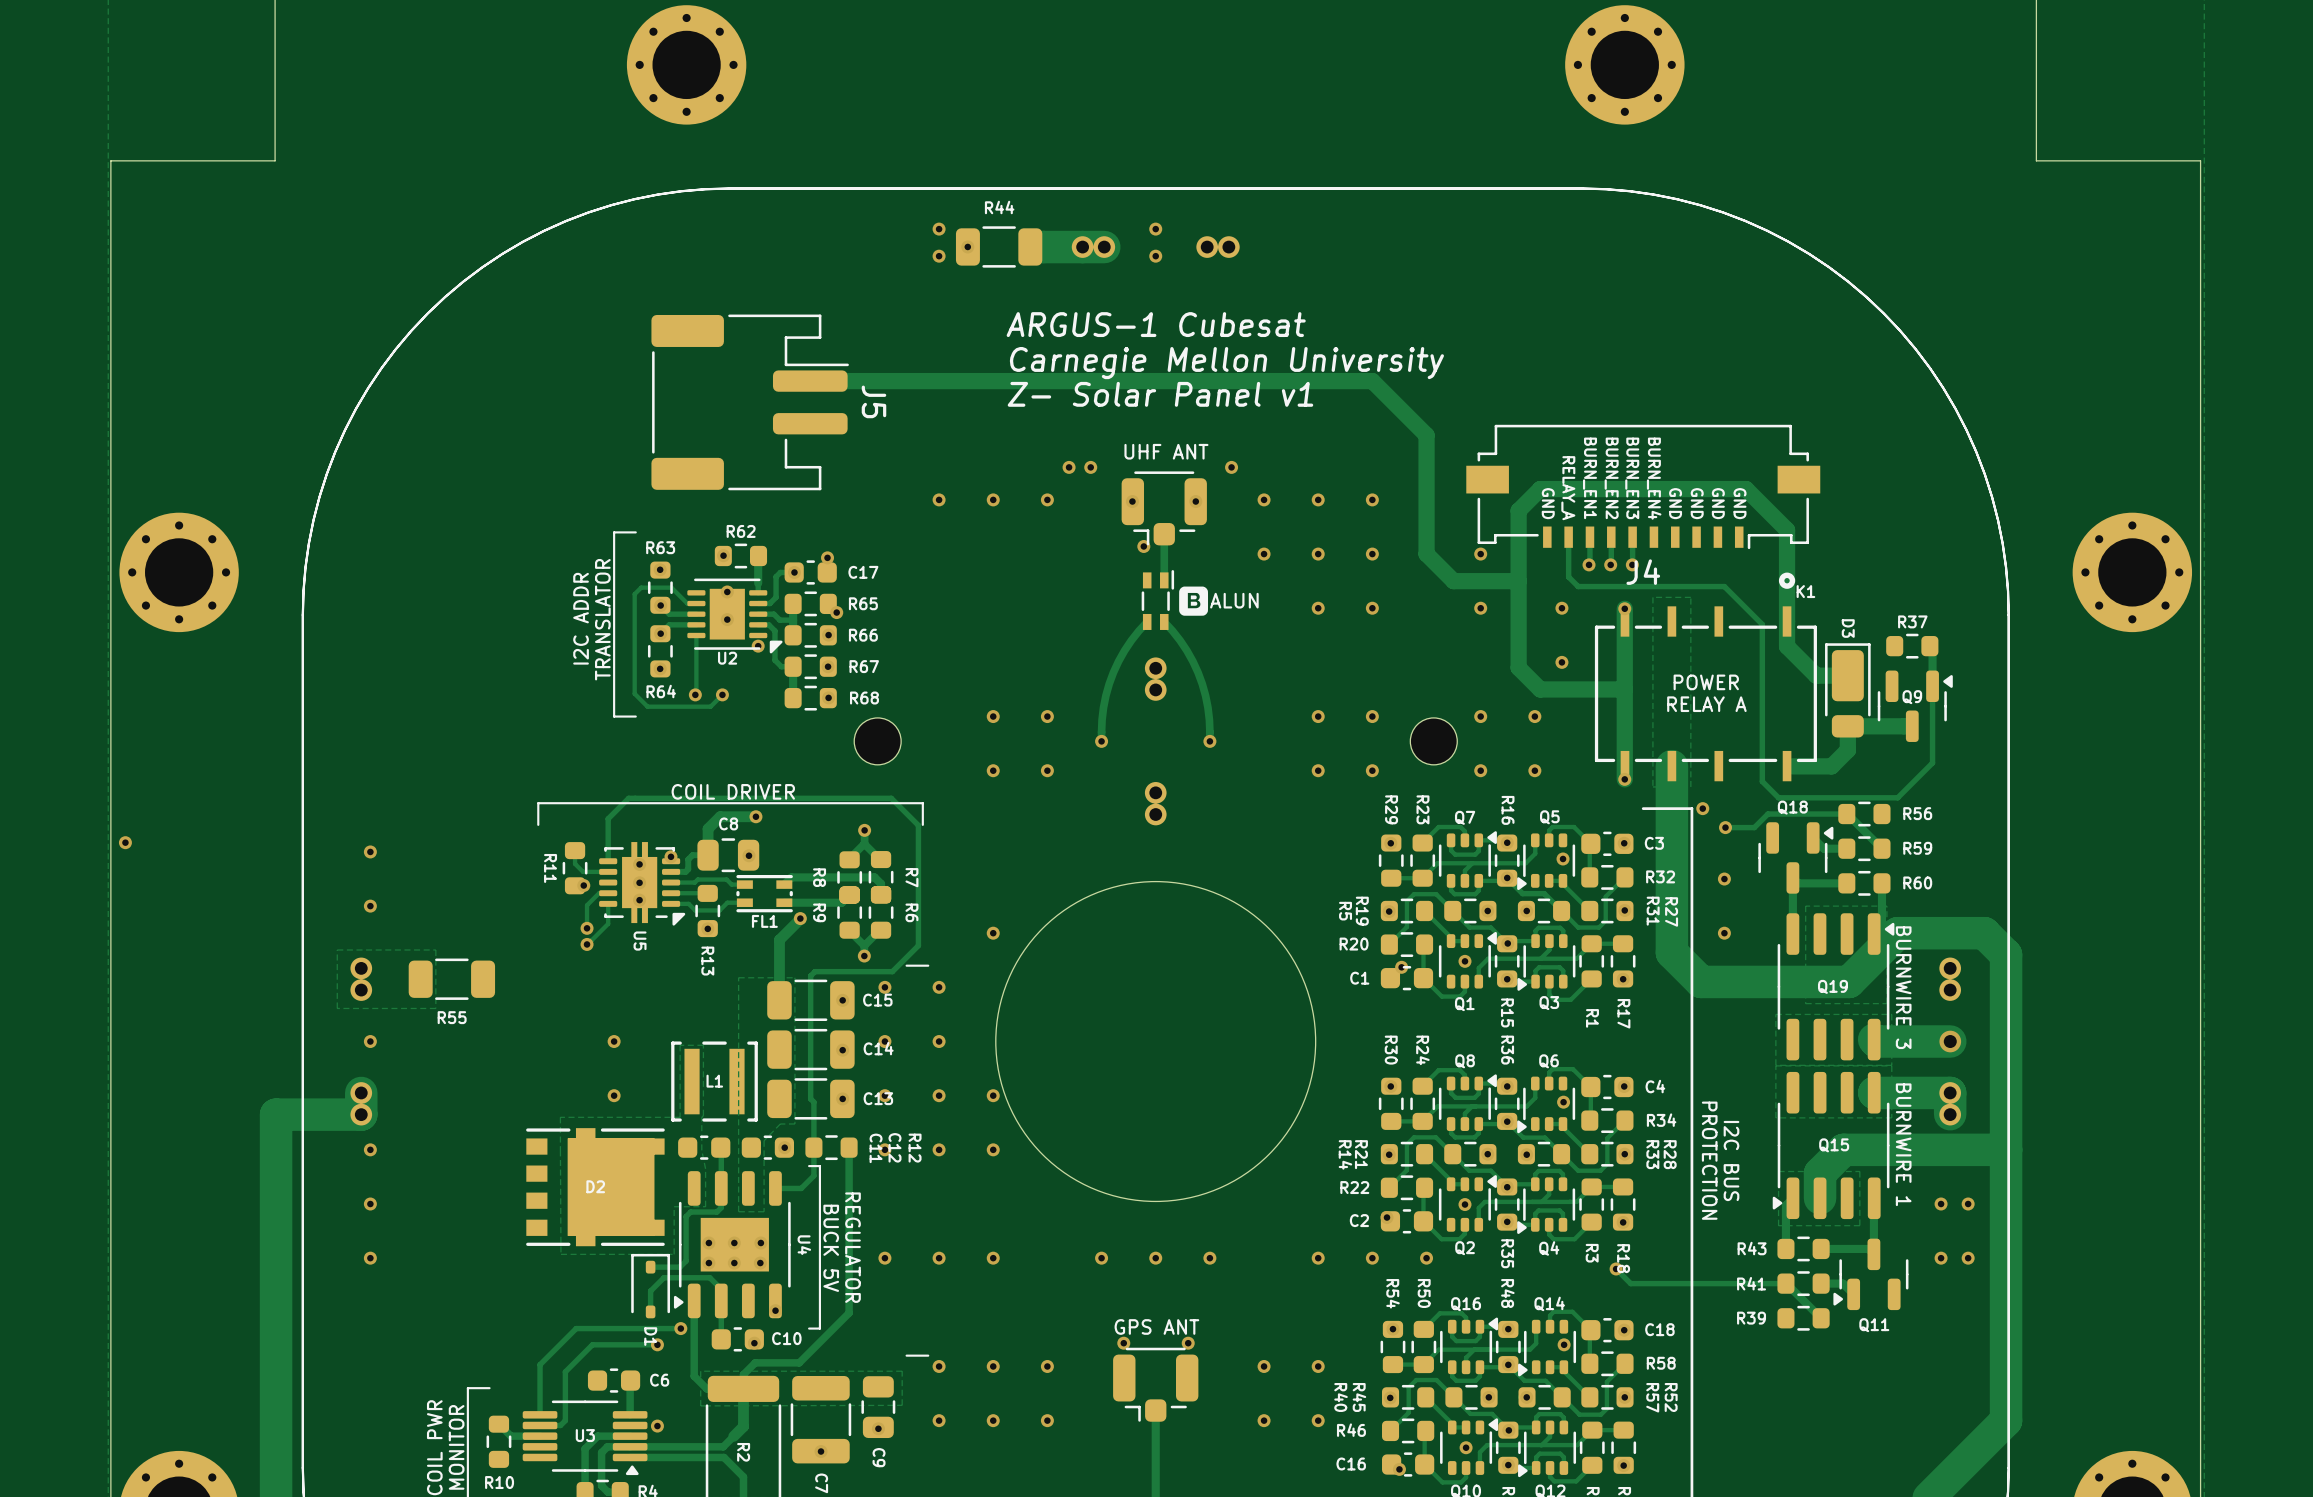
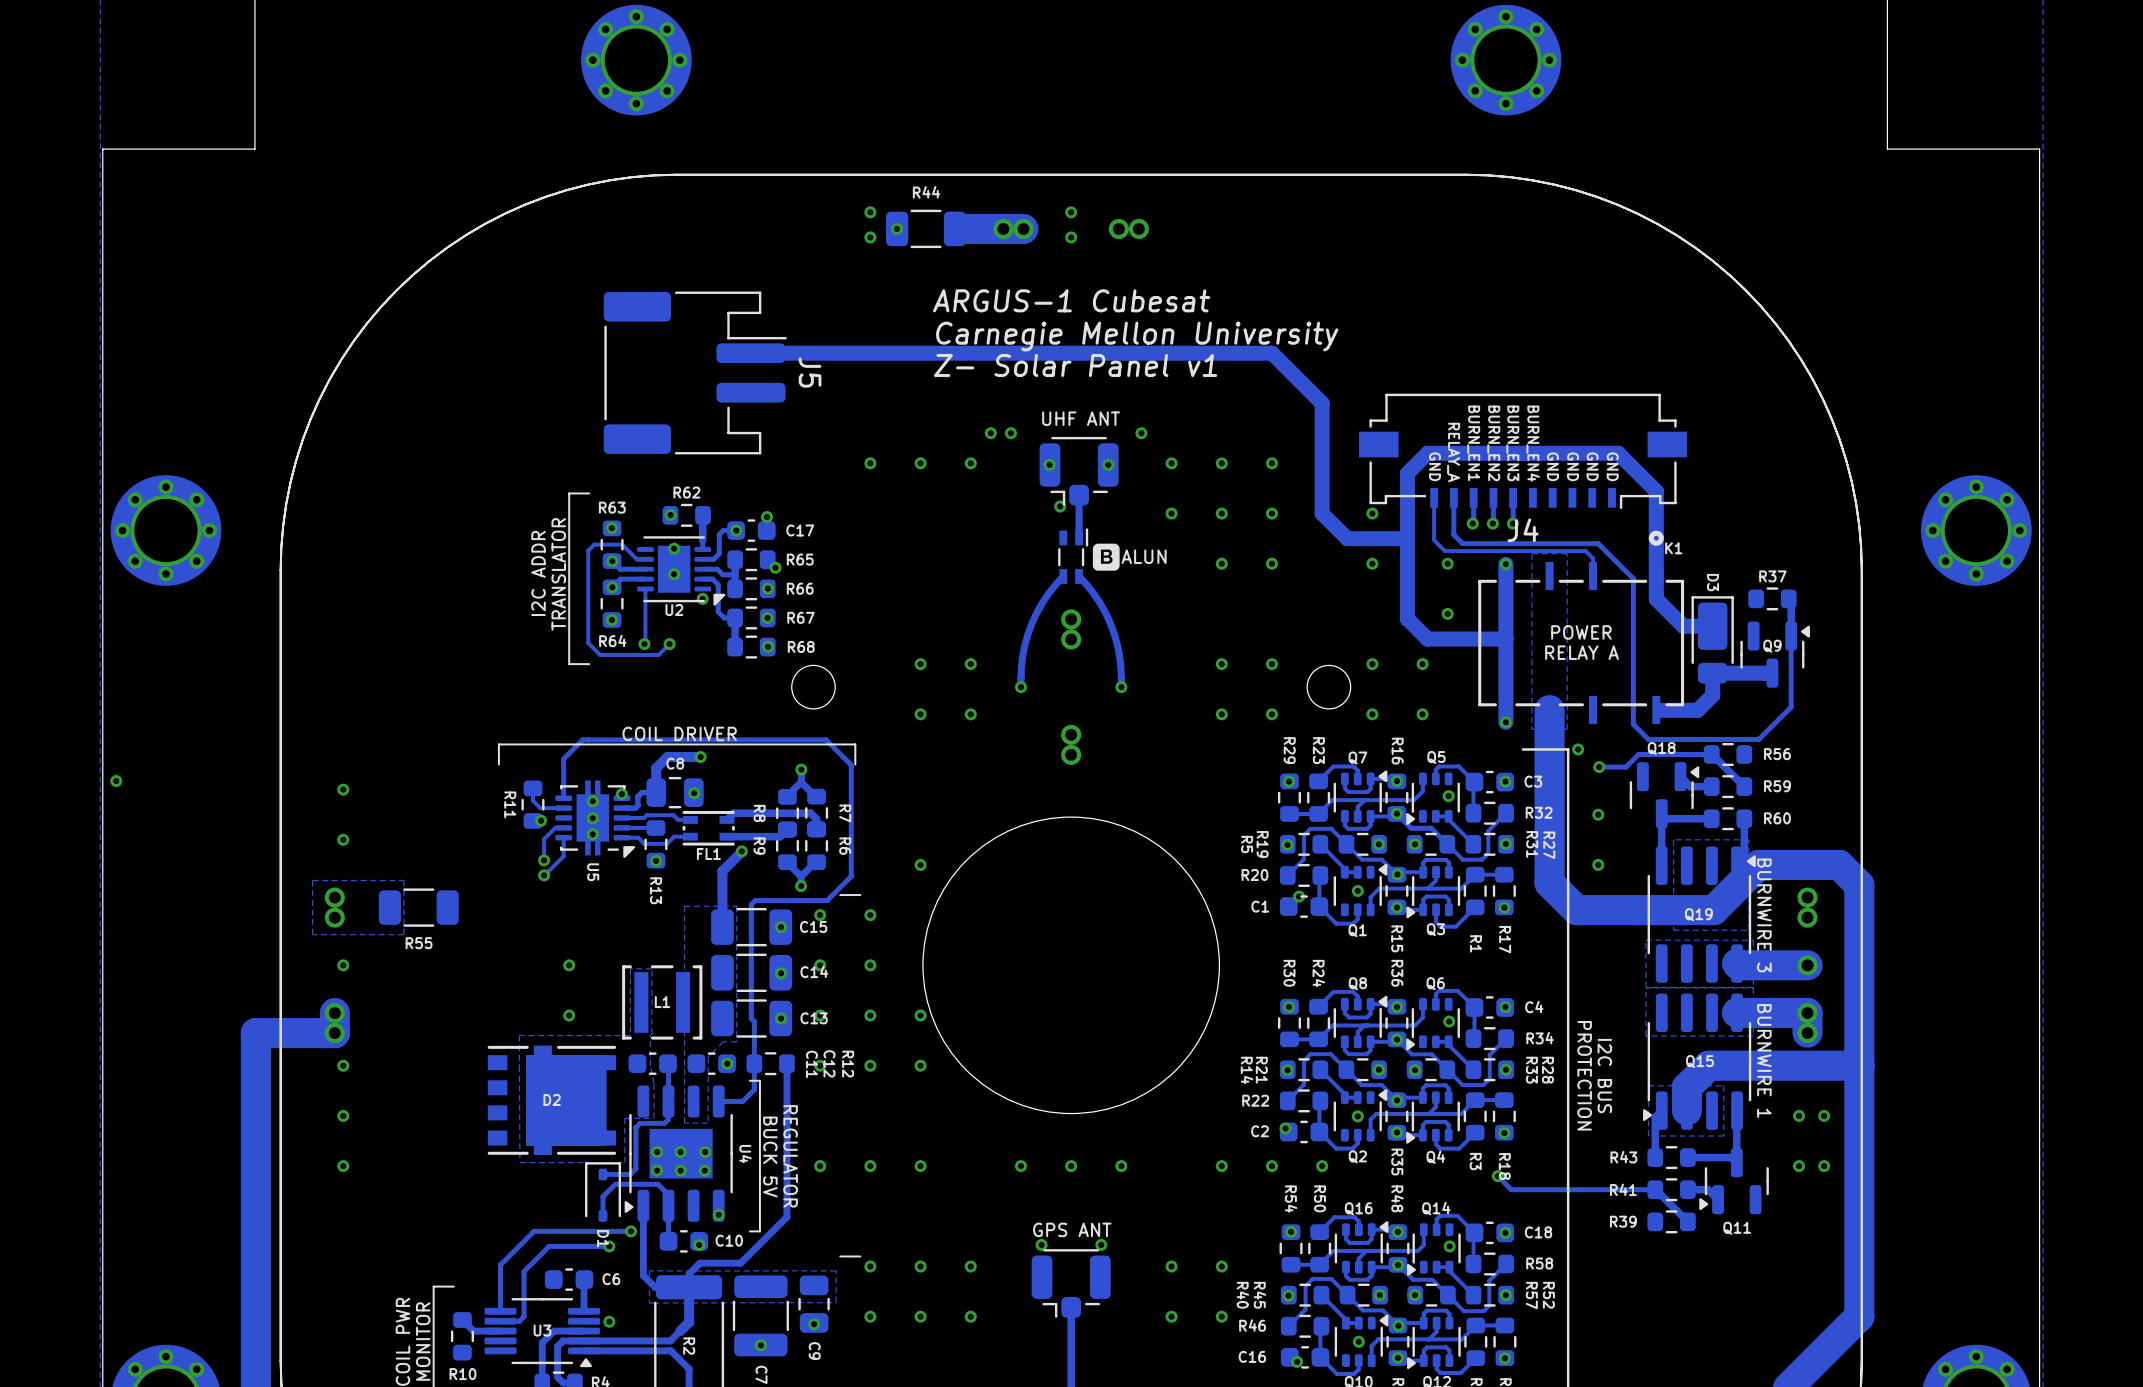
track: none -> (1434, 497) (1434, 540) (1445, 551) (1585, 551) (1593, 558) (1593, 576)

